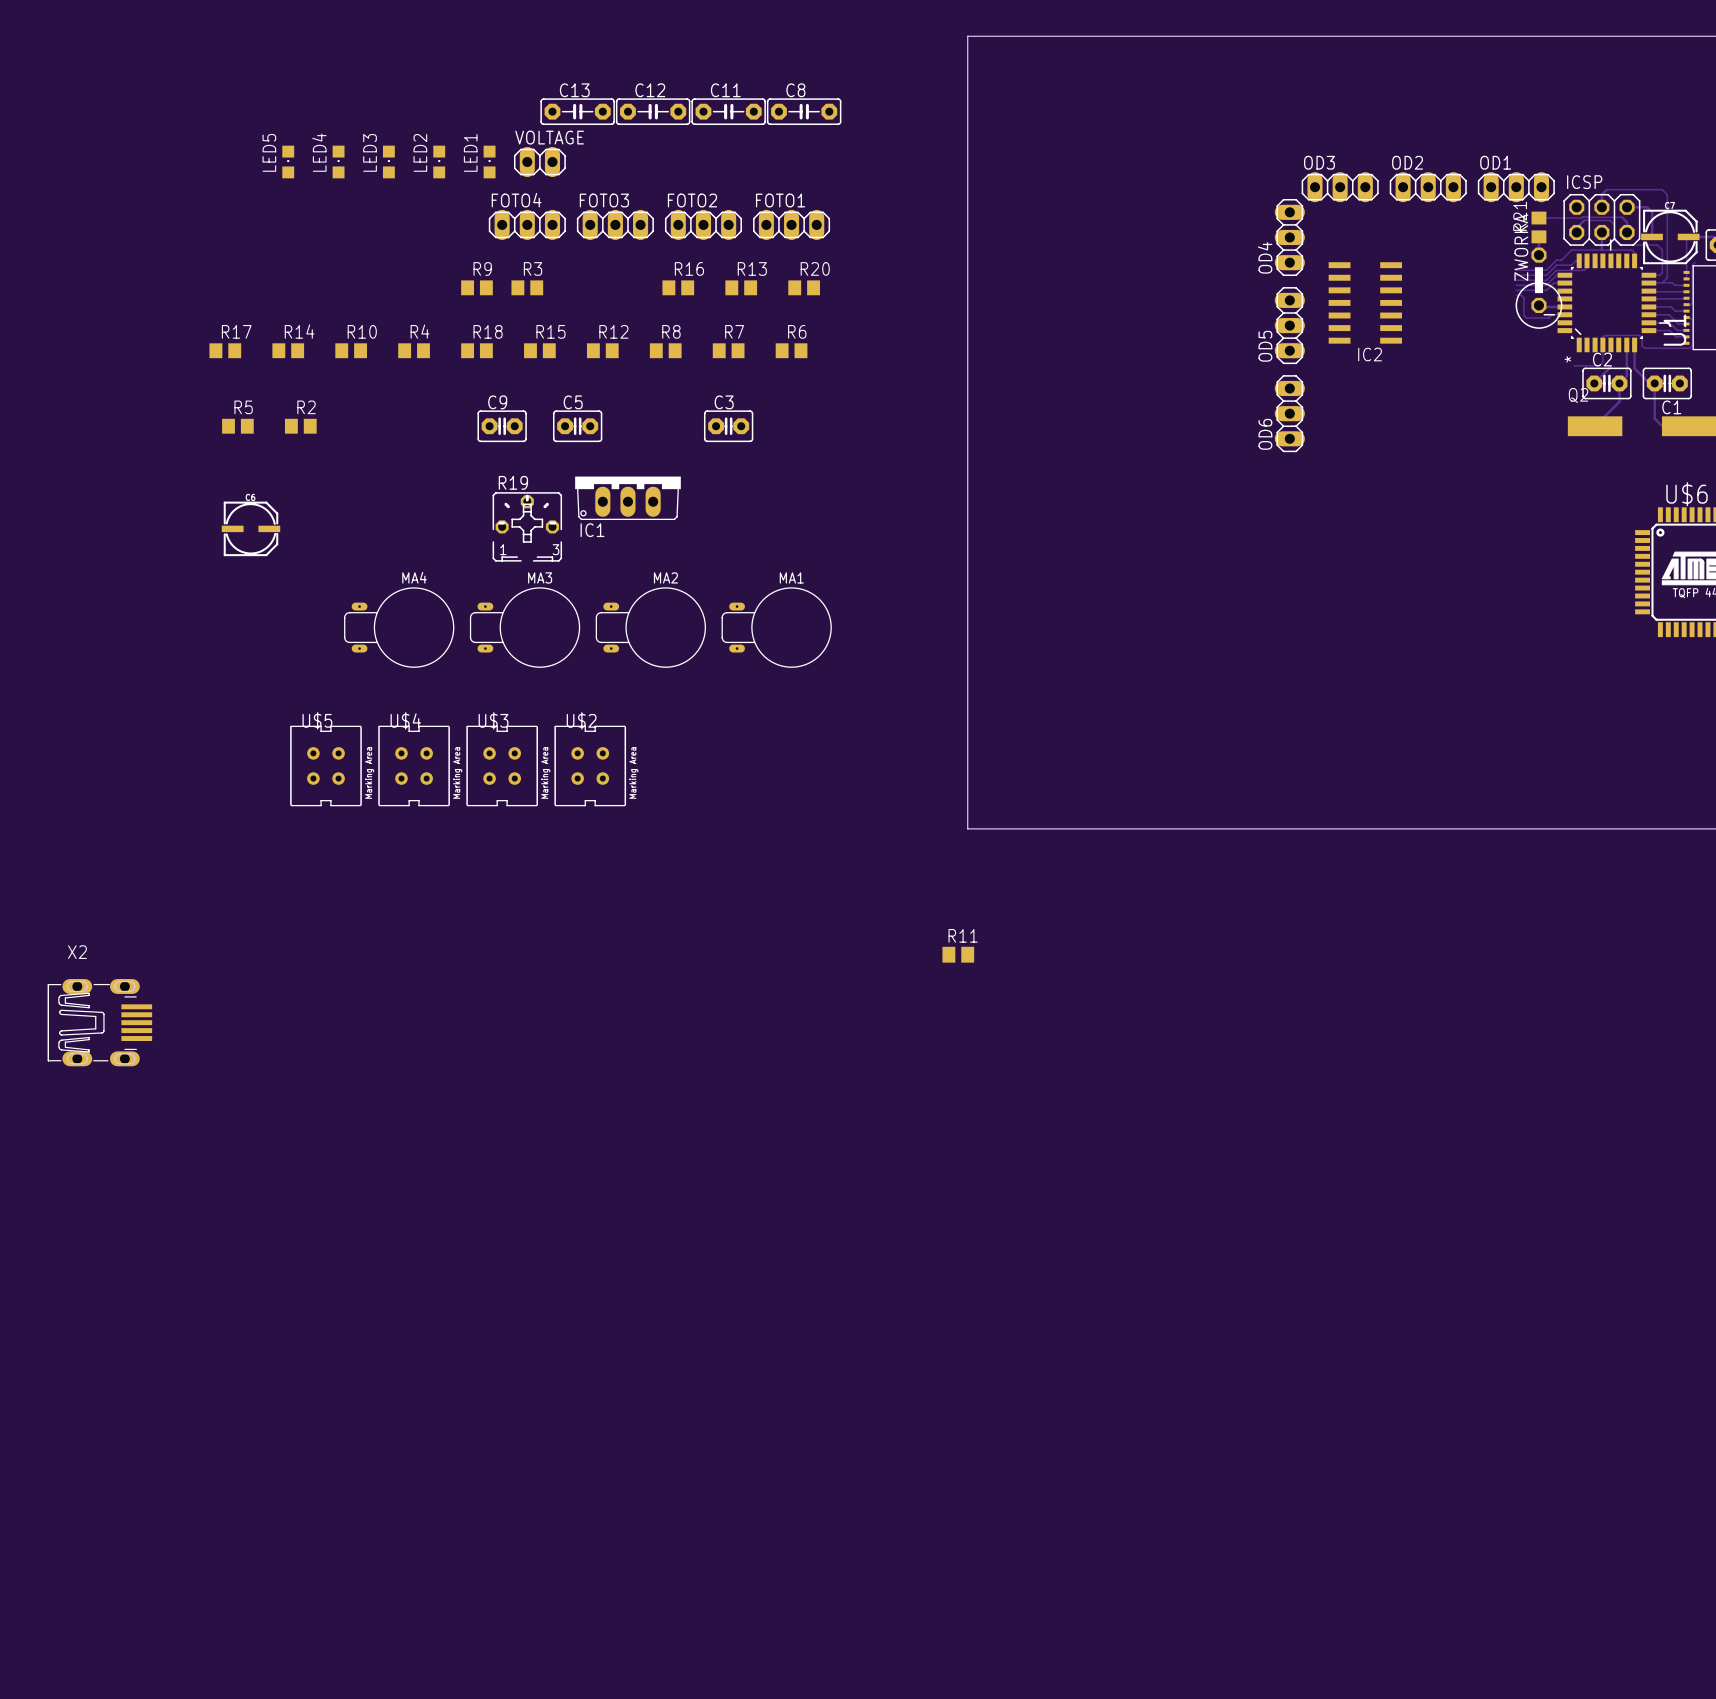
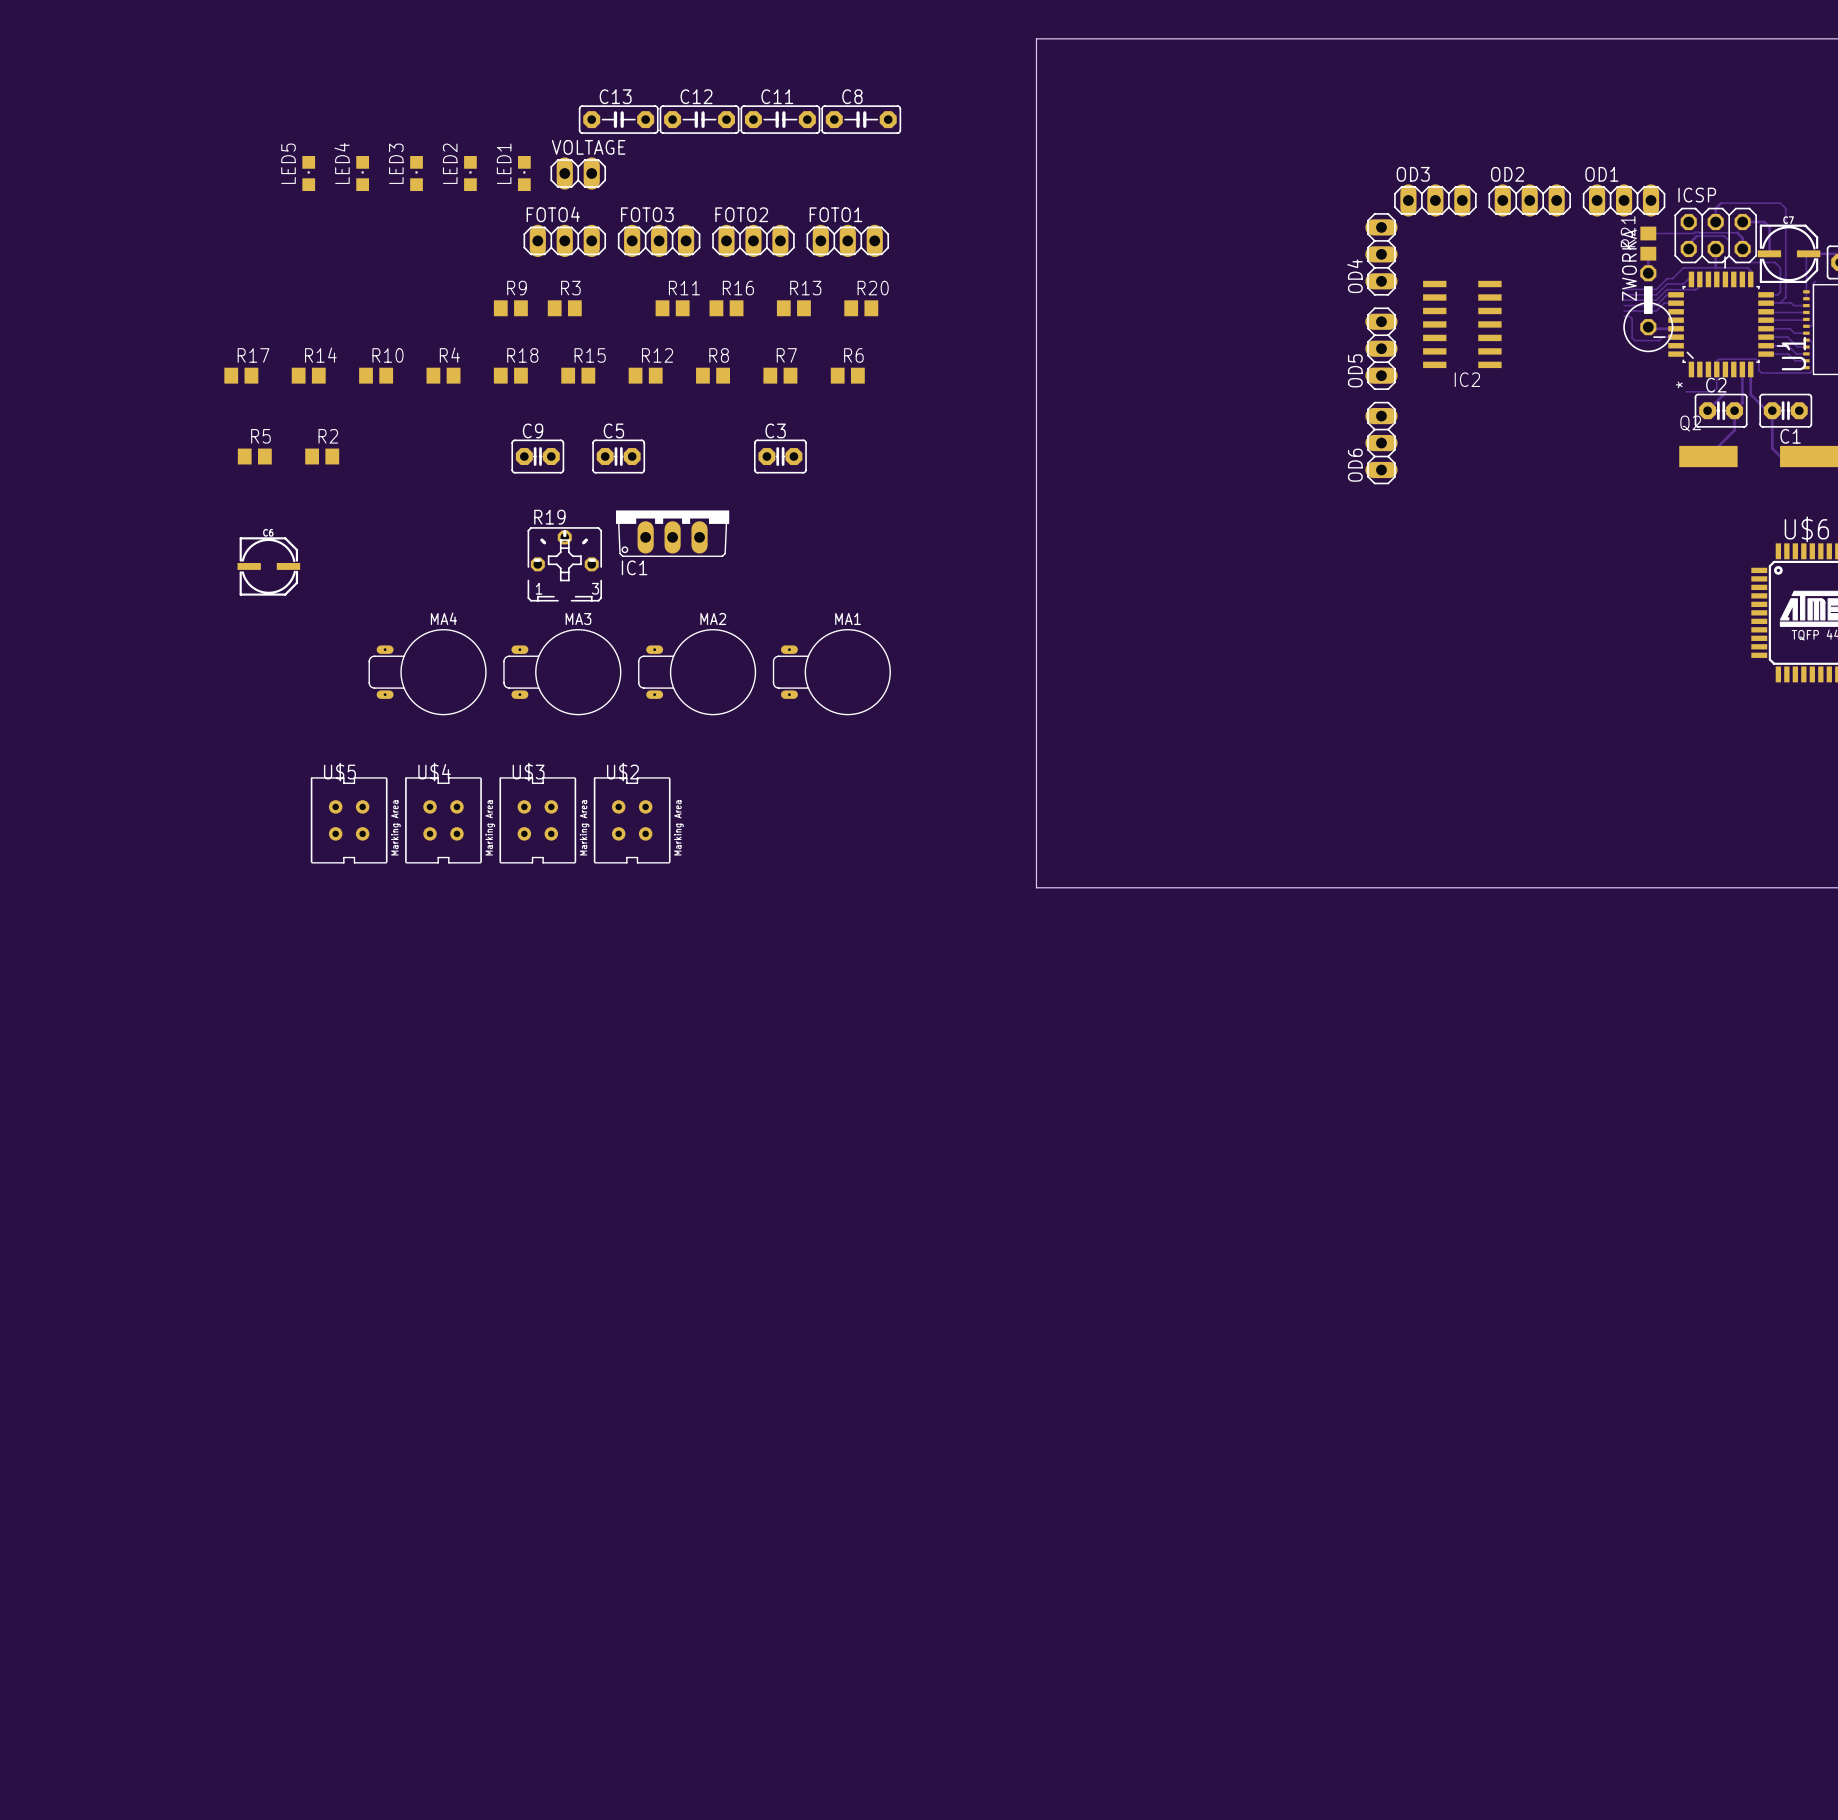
R11 footprint: [942, 946, 975, 963] -> [655, 300, 690, 317]
X2: (100, 1022) -> none

